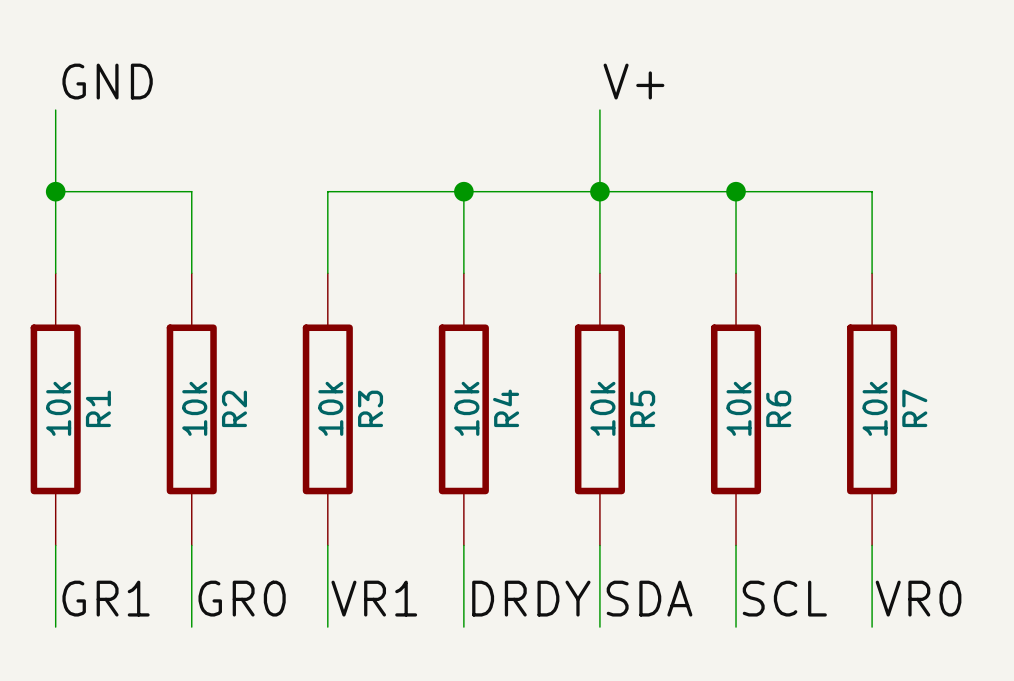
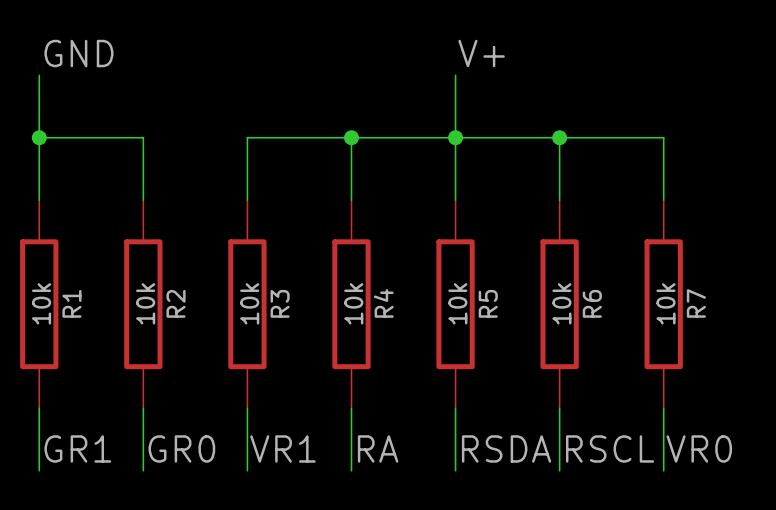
label: DRDY (531, 598) -> RA (378, 448)
label: SDA (649, 598) -> RSDA (506, 448)
label: SCL (784, 598) -> RSCL (610, 448)

